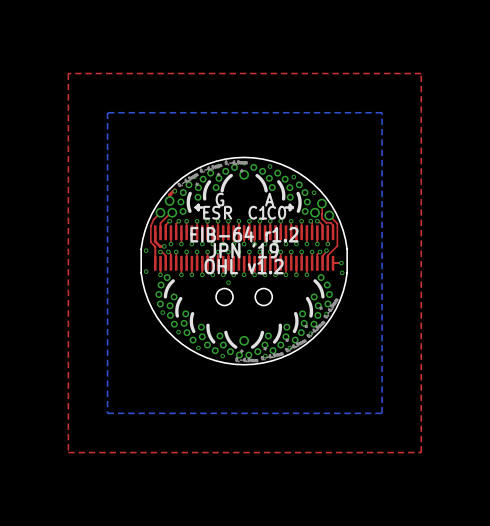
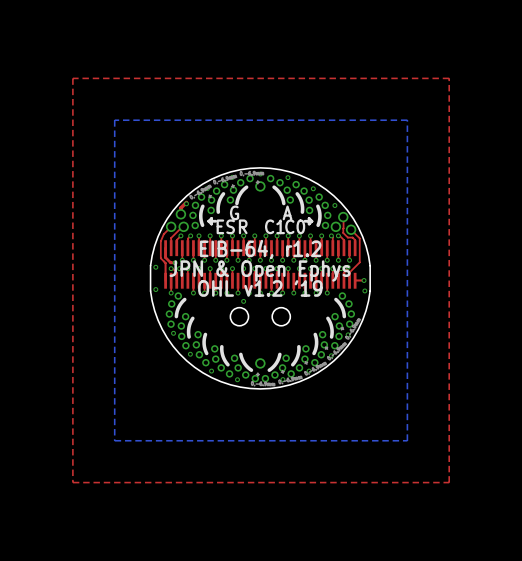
text: EIB-64 r1.2 (244, 234) -> EIB-64, r1.2 (260, 249)
text: JPN '19 (243, 250) -> JPN & Open Ephys (260, 271)
text: OHL v1.2 (244, 266) -> OHL v1.2 '19 (260, 288)

